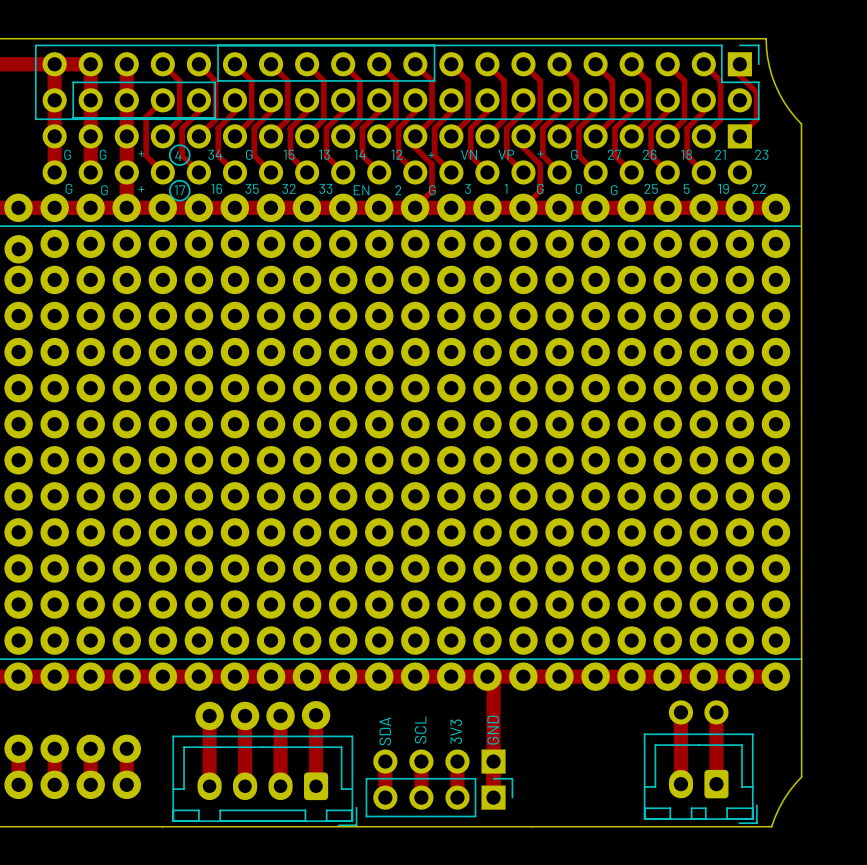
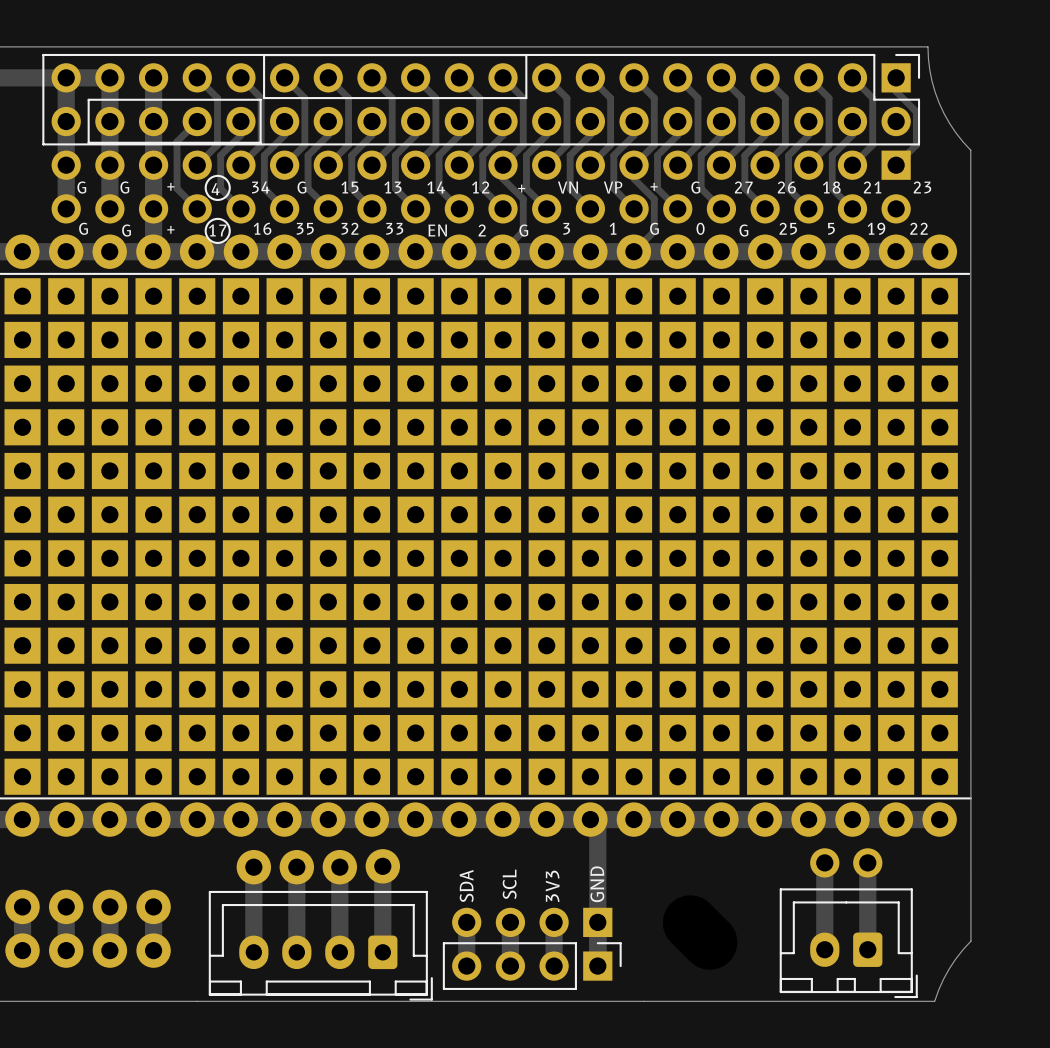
part footprint: [40, 229, 69, 259] -> [48, 278, 85, 315]
part footprint: [76, 229, 105, 259] -> [91, 278, 128, 315]
part footprint: [112, 229, 141, 259] -> [135, 278, 172, 315]
part footprint: [148, 229, 178, 259] -> [179, 278, 216, 315]
part footprint: [184, 229, 214, 259] -> [222, 278, 259, 315]
part footprint: [220, 229, 250, 259] -> [266, 278, 303, 315]
part footprint: [256, 229, 286, 259] -> [310, 278, 347, 315]
part footprint: [292, 229, 322, 259] -> [353, 278, 391, 315]
part footprint: [328, 229, 358, 259] -> [397, 278, 434, 315]
part footprint: [365, 229, 394, 259] -> [441, 278, 478, 315]
part footprint: [401, 229, 430, 259] -> [484, 278, 522, 315]
part footprint: [437, 229, 466, 259] -> [528, 278, 565, 315]
part footprint: [473, 229, 502, 259] -> [572, 278, 609, 315]
part footprint: [509, 229, 538, 259] -> [616, 278, 653, 315]
part footprint: [545, 229, 574, 259] -> [659, 278, 696, 315]
part footprint: [581, 229, 610, 259] -> [703, 278, 740, 315]
part footprint: [617, 229, 646, 259] -> [747, 278, 784, 315]
part footprint: [653, 229, 682, 259] -> [790, 278, 827, 315]
part footprint: [689, 229, 719, 259] -> [834, 278, 871, 315]
part footprint: [725, 229, 755, 259] -> [878, 278, 915, 315]
part footprint: [761, 229, 791, 259] -> [921, 278, 958, 315]
part footprint: [4, 235, 33, 264] -> [4, 278, 41, 315]
part footprint: [4, 265, 33, 295] -> [4, 321, 41, 358]
part footprint: [40, 265, 69, 295] -> [48, 321, 85, 358]
part footprint: [76, 265, 105, 295] -> [91, 321, 128, 358]
part footprint: [112, 265, 141, 295] -> [135, 321, 172, 358]
part footprint: [148, 265, 178, 295] -> [179, 321, 216, 358]
part footprint: [184, 265, 214, 295] -> [222, 321, 259, 358]
part footprint: [220, 265, 250, 295] -> [266, 321, 303, 358]
part footprint: [256, 265, 286, 295] -> [310, 321, 347, 358]
part footprint: [292, 265, 322, 295] -> [353, 321, 391, 358]
part footprint: [328, 265, 358, 295] -> [397, 321, 434, 358]
part footprint: [365, 265, 394, 295] -> [441, 321, 478, 358]
part footprint: [401, 265, 430, 295] -> [484, 321, 522, 358]
part footprint: [437, 265, 466, 295] -> [528, 321, 565, 358]
part footprint: [473, 265, 502, 295] -> [572, 321, 609, 358]
part footprint: [509, 265, 538, 295] -> [616, 321, 653, 358]
part footprint: [545, 265, 574, 295] -> [659, 321, 696, 358]
part footprint: [581, 265, 610, 295] -> [703, 321, 740, 358]
part footprint: [617, 265, 646, 295] -> [747, 321, 784, 358]
part footprint: [653, 265, 682, 295] -> [790, 321, 827, 358]
part footprint: [689, 265, 719, 295] -> [834, 321, 871, 358]
part footprint: [725, 265, 755, 295] -> [878, 321, 915, 358]
part footprint: [761, 265, 791, 295] -> [921, 321, 958, 358]
part footprint: [4, 301, 33, 331] -> [4, 365, 41, 402]
part footprint: [40, 301, 69, 331] -> [48, 365, 85, 402]
part footprint: [76, 301, 105, 331] -> [91, 365, 128, 402]
part footprint: [112, 301, 141, 331] -> [135, 365, 172, 402]
part footprint: [148, 301, 178, 331] -> [179, 365, 216, 402]
part footprint: [184, 301, 214, 331] -> [222, 365, 259, 402]
part footprint: [220, 301, 250, 331] -> [266, 365, 303, 402]
part footprint: [256, 301, 286, 331] -> [310, 365, 347, 402]
part footprint: [292, 301, 322, 331] -> [353, 365, 391, 402]
part footprint: [328, 301, 358, 331] -> [397, 365, 434, 402]
part footprint: [365, 301, 394, 331] -> [441, 365, 478, 402]
part footprint: [401, 301, 430, 331] -> [484, 365, 522, 402]
part footprint: [437, 301, 466, 331] -> [528, 365, 565, 402]
part footprint: [473, 301, 502, 331] -> [572, 365, 609, 402]
part footprint: [509, 301, 538, 331] -> [616, 365, 653, 402]
part footprint: [545, 301, 574, 331] -> [659, 365, 696, 402]
part footprint: [581, 301, 610, 331] -> [703, 365, 740, 402]
part footprint: [617, 301, 646, 331] -> [747, 365, 784, 402]
part footprint: [653, 301, 682, 331] -> [790, 365, 827, 402]
part footprint: [689, 301, 719, 331] -> [834, 365, 871, 402]
part footprint: [725, 301, 755, 331] -> [878, 365, 915, 402]
part footprint: [761, 301, 791, 331] -> [921, 365, 958, 402]
part footprint: [4, 337, 33, 367] -> [4, 409, 41, 446]
part footprint: [40, 337, 69, 367] -> [48, 409, 85, 446]
part footprint: [76, 337, 105, 367] -> [91, 409, 128, 446]
part footprint: [112, 337, 141, 367] -> [135, 409, 172, 446]
part footprint: [148, 337, 178, 367] -> [179, 409, 216, 446]
part footprint: [184, 337, 214, 367] -> [222, 409, 259, 446]
part footprint: [220, 337, 250, 367] -> [266, 409, 303, 446]
part footprint: [256, 337, 286, 367] -> [310, 409, 347, 446]
part footprint: [292, 337, 322, 367] -> [353, 409, 391, 446]
part footprint: [328, 337, 358, 367] -> [397, 409, 434, 446]
part footprint: [365, 337, 394, 367] -> [441, 409, 478, 446]
part footprint: [401, 337, 430, 367] -> [484, 409, 522, 446]
part footprint: [437, 337, 466, 367] -> [528, 409, 565, 446]
part footprint: [473, 337, 502, 367] -> [572, 409, 609, 446]
part footprint: [509, 337, 538, 367] -> [616, 409, 653, 446]
part footprint: [545, 337, 574, 367] -> [659, 409, 696, 446]
part footprint: [581, 337, 610, 367] -> [703, 409, 740, 446]
part footprint: [617, 337, 646, 367] -> [747, 409, 784, 446]
part footprint: [653, 337, 682, 367] -> [790, 409, 827, 446]
part footprint: [689, 337, 719, 367] -> [834, 409, 871, 446]
part footprint: [725, 337, 755, 367] -> [878, 409, 915, 446]
part footprint: [761, 337, 791, 367] -> [921, 409, 958, 446]
part footprint: [4, 373, 33, 403] -> [4, 452, 41, 490]
part footprint: [40, 373, 69, 403] -> [48, 452, 85, 490]
part footprint: [76, 373, 105, 403] -> [91, 452, 128, 490]
part footprint: [112, 373, 141, 403] -> [135, 452, 172, 490]
part footprint: [148, 373, 178, 403] -> [179, 452, 216, 490]
part footprint: [184, 373, 214, 403] -> [222, 452, 259, 490]
part footprint: [220, 373, 250, 403] -> [266, 452, 303, 490]
part footprint: [256, 373, 286, 403] -> [310, 452, 347, 490]
part footprint: [292, 373, 322, 403] -> [353, 452, 391, 490]
part footprint: [328, 373, 358, 403] -> [397, 452, 434, 490]
part footprint: [365, 373, 394, 403] -> [441, 452, 478, 490]
part footprint: [401, 373, 430, 403] -> [484, 452, 522, 490]
part footprint: [437, 373, 466, 403] -> [528, 452, 565, 490]
part footprint: [473, 373, 502, 403] -> [572, 452, 609, 490]
part footprint: [509, 373, 538, 403] -> [616, 452, 653, 490]
part footprint: [545, 373, 574, 403] -> [659, 452, 696, 490]
part footprint: [581, 373, 610, 403] -> [703, 452, 740, 490]
part footprint: [617, 373, 646, 403] -> [747, 452, 784, 490]
part footprint: [653, 373, 682, 403] -> [790, 452, 827, 490]
part footprint: [689, 373, 719, 403] -> [834, 452, 871, 490]
part footprint: [725, 373, 755, 403] -> [878, 452, 915, 490]
part footprint: [761, 373, 791, 403] -> [921, 452, 958, 490]
part footprint: [4, 410, 33, 439] -> [4, 496, 41, 533]
part footprint: [40, 410, 69, 439] -> [48, 496, 85, 533]
part footprint: [76, 410, 105, 439] -> [91, 496, 128, 533]
part footprint: [112, 410, 141, 439] -> [135, 496, 172, 533]
part footprint: [148, 410, 178, 439] -> [179, 496, 216, 533]
part footprint: [184, 410, 214, 439] -> [222, 496, 259, 533]
part footprint: [220, 410, 250, 439] -> [266, 496, 303, 533]
part footprint: [256, 410, 286, 439] -> [310, 496, 347, 533]
part footprint: [292, 410, 322, 439] -> [353, 496, 391, 533]
part footprint: [328, 410, 358, 439] -> [397, 496, 434, 533]
part footprint: [365, 410, 394, 439] -> [441, 496, 478, 533]
part footprint: [401, 410, 430, 439] -> [484, 496, 522, 533]
part footprint: [437, 410, 466, 439] -> [528, 496, 565, 533]
part footprint: [473, 410, 502, 439] -> [572, 496, 609, 533]
part footprint: [509, 410, 538, 439] -> [616, 496, 653, 533]
part footprint: [545, 410, 574, 439] -> [659, 496, 696, 533]
part footprint: [581, 410, 610, 439] -> [703, 496, 740, 533]
part footprint: [617, 410, 646, 439] -> [747, 496, 784, 533]
part footprint: [653, 410, 682, 439] -> [790, 496, 827, 533]
part footprint: [689, 410, 719, 439] -> [834, 496, 871, 533]
part footprint: [725, 410, 755, 439] -> [878, 496, 915, 533]
part footprint: [761, 410, 791, 439] -> [921, 496, 958, 533]
part footprint: [4, 446, 33, 475] -> [4, 540, 41, 577]
part footprint: [40, 446, 69, 475] -> [48, 540, 85, 577]
part footprint: [76, 446, 105, 475] -> [91, 540, 128, 577]
part footprint: [112, 446, 141, 475] -> [135, 540, 172, 577]
part footprint: [148, 446, 178, 475] -> [179, 540, 216, 577]
part footprint: [184, 446, 214, 475] -> [222, 540, 259, 577]
part footprint: [220, 446, 250, 475] -> [266, 540, 303, 577]
part footprint: [256, 446, 286, 475] -> [310, 540, 347, 577]
part footprint: [292, 446, 322, 475] -> [353, 540, 391, 577]
part footprint: [328, 446, 358, 475] -> [397, 540, 434, 577]
part footprint: [365, 446, 394, 475] -> [441, 540, 478, 577]
part footprint: [401, 446, 430, 475] -> [484, 540, 522, 577]
part footprint: [437, 446, 466, 475] -> [528, 540, 565, 577]
part footprint: [473, 446, 502, 475] -> [572, 540, 609, 577]
part footprint: [509, 446, 538, 475] -> [616, 540, 653, 577]
part footprint: [545, 446, 574, 475] -> [659, 540, 696, 577]
part footprint: [581, 446, 610, 475] -> [703, 540, 740, 577]
part footprint: [617, 446, 646, 475] -> [747, 540, 784, 577]
part footprint: [653, 446, 682, 475] -> [790, 540, 827, 577]
part footprint: [689, 446, 719, 475] -> [834, 540, 871, 577]
part footprint: [725, 446, 755, 475] -> [878, 540, 915, 577]
part footprint: [761, 446, 791, 475] -> [921, 540, 958, 577]
part footprint: [4, 482, 33, 511] -> [4, 583, 41, 621]
part footprint: [40, 482, 69, 511] -> [48, 583, 85, 621]
part footprint: [76, 482, 105, 511] -> [91, 583, 128, 621]
part footprint: [112, 482, 141, 511] -> [135, 583, 172, 621]
part footprint: [148, 482, 178, 511] -> [179, 583, 216, 621]
part footprint: [184, 482, 214, 511] -> [222, 583, 259, 621]
part footprint: [220, 482, 250, 511] -> [266, 583, 303, 621]
part footprint: [256, 482, 286, 511] -> [310, 583, 347, 621]
part footprint: [292, 482, 322, 511] -> [353, 583, 391, 621]
part footprint: [328, 482, 358, 511] -> [397, 583, 434, 621]
part footprint: [365, 482, 394, 511] -> [441, 583, 478, 621]
part footprint: [401, 482, 430, 511] -> [484, 583, 522, 621]
part footprint: [437, 482, 466, 511] -> [528, 583, 565, 621]
part footprint: [473, 482, 502, 511] -> [572, 583, 609, 621]
part footprint: [509, 482, 538, 511] -> [616, 583, 653, 621]
part footprint: [545, 482, 574, 511] -> [659, 583, 696, 621]
part footprint: [581, 482, 610, 511] -> [703, 583, 740, 621]
part footprint: [617, 482, 646, 511] -> [747, 583, 784, 621]
part footprint: [653, 482, 682, 511] -> [790, 583, 827, 621]
part footprint: [689, 482, 719, 511] -> [834, 583, 871, 621]
part footprint: [725, 482, 755, 511] -> [878, 583, 915, 621]
part footprint: [761, 482, 791, 511] -> [921, 583, 958, 621]
part footprint: [4, 518, 33, 547] -> [4, 627, 41, 664]
part footprint: [40, 518, 69, 547] -> [48, 627, 85, 664]
part footprint: [76, 518, 105, 547] -> [91, 627, 128, 664]
part footprint: [112, 518, 141, 547] -> [135, 627, 172, 664]
part footprint: [148, 518, 178, 547] -> [179, 627, 216, 664]
part footprint: [184, 518, 214, 547] -> [222, 627, 259, 664]
part footprint: [220, 518, 250, 547] -> [266, 627, 303, 664]
part footprint: [256, 518, 286, 547] -> [310, 627, 347, 664]
part footprint: [292, 518, 322, 547] -> [353, 627, 391, 664]
part footprint: [328, 518, 358, 547] -> [397, 627, 434, 664]
part footprint: [365, 518, 394, 547] -> [441, 627, 478, 664]
part footprint: [401, 518, 430, 547] -> [484, 627, 522, 664]
part footprint: [437, 518, 466, 547] -> [528, 627, 565, 664]
part footprint: [473, 518, 502, 547] -> [572, 627, 609, 664]
part footprint: [509, 518, 538, 547] -> [616, 627, 653, 664]
part footprint: [545, 518, 574, 547] -> [659, 627, 696, 664]
part footprint: [581, 518, 610, 547] -> [703, 627, 740, 664]
part footprint: [617, 518, 646, 547] -> [747, 627, 784, 664]
part footprint: [653, 518, 682, 547] -> [790, 627, 827, 664]
part footprint: [689, 518, 719, 547] -> [834, 627, 871, 664]
part footprint: [725, 518, 755, 547] -> [878, 627, 915, 664]
part footprint: [761, 518, 791, 547] -> [921, 627, 958, 664]
part footprint: [4, 554, 33, 583] -> [4, 671, 41, 708]
part footprint: [40, 554, 69, 583] -> [48, 671, 85, 708]
part footprint: [76, 554, 105, 583] -> [91, 671, 128, 708]
part footprint: [112, 554, 141, 583] -> [135, 671, 172, 708]
part footprint: [148, 554, 178, 583] -> [179, 671, 216, 708]
part footprint: [184, 554, 214, 583] -> [222, 671, 259, 708]
part footprint: [220, 554, 250, 583] -> [266, 671, 303, 708]
part footprint: [256, 554, 286, 583] -> [310, 671, 347, 708]
part footprint: [292, 554, 322, 583] -> [353, 671, 391, 708]
part footprint: [328, 554, 358, 583] -> [397, 671, 434, 708]
part footprint: [365, 554, 394, 583] -> [441, 671, 478, 708]
part footprint: [401, 554, 430, 583] -> [484, 671, 522, 708]
part footprint: [437, 554, 466, 583] -> [528, 671, 565, 708]
part footprint: [473, 554, 502, 583] -> [572, 671, 609, 708]
part footprint: [509, 554, 538, 583] -> [616, 671, 653, 708]
part footprint: [545, 554, 574, 583] -> [659, 671, 696, 708]
part footprint: [581, 554, 610, 583] -> [703, 671, 740, 708]
part footprint: [617, 554, 646, 583] -> [747, 671, 784, 708]
part footprint: [653, 554, 682, 583] -> [790, 671, 827, 708]
part footprint: [689, 554, 719, 583] -> [834, 671, 871, 708]
part footprint: [725, 554, 755, 583] -> [878, 671, 915, 708]
part footprint: [761, 554, 791, 583] -> [921, 671, 958, 708]
part footprint: [4, 590, 33, 619] -> [4, 715, 41, 752]
part footprint: [40, 590, 69, 619] -> [48, 715, 85, 752]
part footprint: [76, 590, 105, 619] -> [91, 715, 128, 752]
part footprint: [112, 590, 141, 619] -> [135, 715, 172, 752]
part footprint: [148, 590, 178, 619] -> [179, 715, 216, 752]
part footprint: [184, 590, 214, 619] -> [222, 715, 259, 752]
part footprint: [220, 590, 250, 619] -> [266, 715, 303, 752]
part footprint: [256, 590, 286, 619] -> [310, 715, 347, 752]
part footprint: [292, 590, 322, 619] -> [353, 715, 391, 752]
part footprint: [328, 590, 358, 619] -> [397, 715, 434, 752]
part footprint: [365, 590, 394, 619] -> [441, 715, 478, 752]
part footprint: [401, 590, 430, 619] -> [484, 715, 522, 752]
part footprint: [437, 590, 466, 619] -> [528, 715, 565, 752]
part footprint: [473, 590, 502, 619] -> [572, 715, 609, 752]
part footprint: [509, 590, 538, 619] -> [616, 715, 653, 752]
part footprint: [545, 590, 574, 619] -> [659, 715, 696, 752]
part footprint: [581, 590, 610, 619] -> [703, 715, 740, 752]
part footprint: [617, 590, 646, 619] -> [747, 715, 784, 752]
part footprint: [653, 590, 682, 619] -> [790, 715, 827, 752]
part footprint: [689, 590, 719, 619] -> [834, 715, 871, 752]
part footprint: [725, 590, 755, 619] -> [878, 715, 915, 752]
part footprint: [761, 590, 791, 619] -> [921, 715, 958, 752]
part footprint: [4, 626, 33, 655] -> [4, 758, 41, 795]
part footprint: [40, 626, 69, 655] -> [48, 758, 85, 795]
part footprint: [76, 626, 105, 655] -> [91, 758, 128, 795]
part footprint: [112, 626, 141, 655] -> [135, 758, 172, 795]
part footprint: [148, 626, 178, 655] -> [179, 758, 216, 795]
part footprint: [184, 626, 214, 655] -> [222, 758, 259, 795]
part footprint: [220, 626, 250, 655] -> [266, 758, 303, 795]
part footprint: [256, 626, 286, 655] -> [310, 758, 347, 795]
part footprint: [292, 626, 322, 655] -> [353, 758, 391, 795]
part footprint: [328, 626, 358, 655] -> [397, 758, 434, 795]
part footprint: [365, 626, 394, 655] -> [441, 758, 478, 795]
part footprint: [401, 626, 430, 655] -> [484, 758, 522, 795]
part footprint: [437, 626, 466, 655] -> [528, 758, 565, 795]
part footprint: [473, 626, 502, 655] -> [572, 758, 609, 795]
part footprint: [509, 626, 538, 655] -> [616, 758, 653, 795]
part footprint: [545, 626, 574, 655] -> [659, 758, 696, 795]
part footprint: [581, 626, 610, 655] -> [703, 758, 740, 795]
part footprint: [617, 626, 646, 655] -> [747, 758, 784, 795]
part footprint: [653, 626, 682, 655] -> [790, 758, 827, 795]
part footprint: [689, 626, 719, 655] -> [834, 758, 871, 795]
part footprint: [725, 626, 755, 655] -> [878, 758, 915, 795]
part footprint: [761, 626, 791, 655] -> [921, 758, 958, 795]

